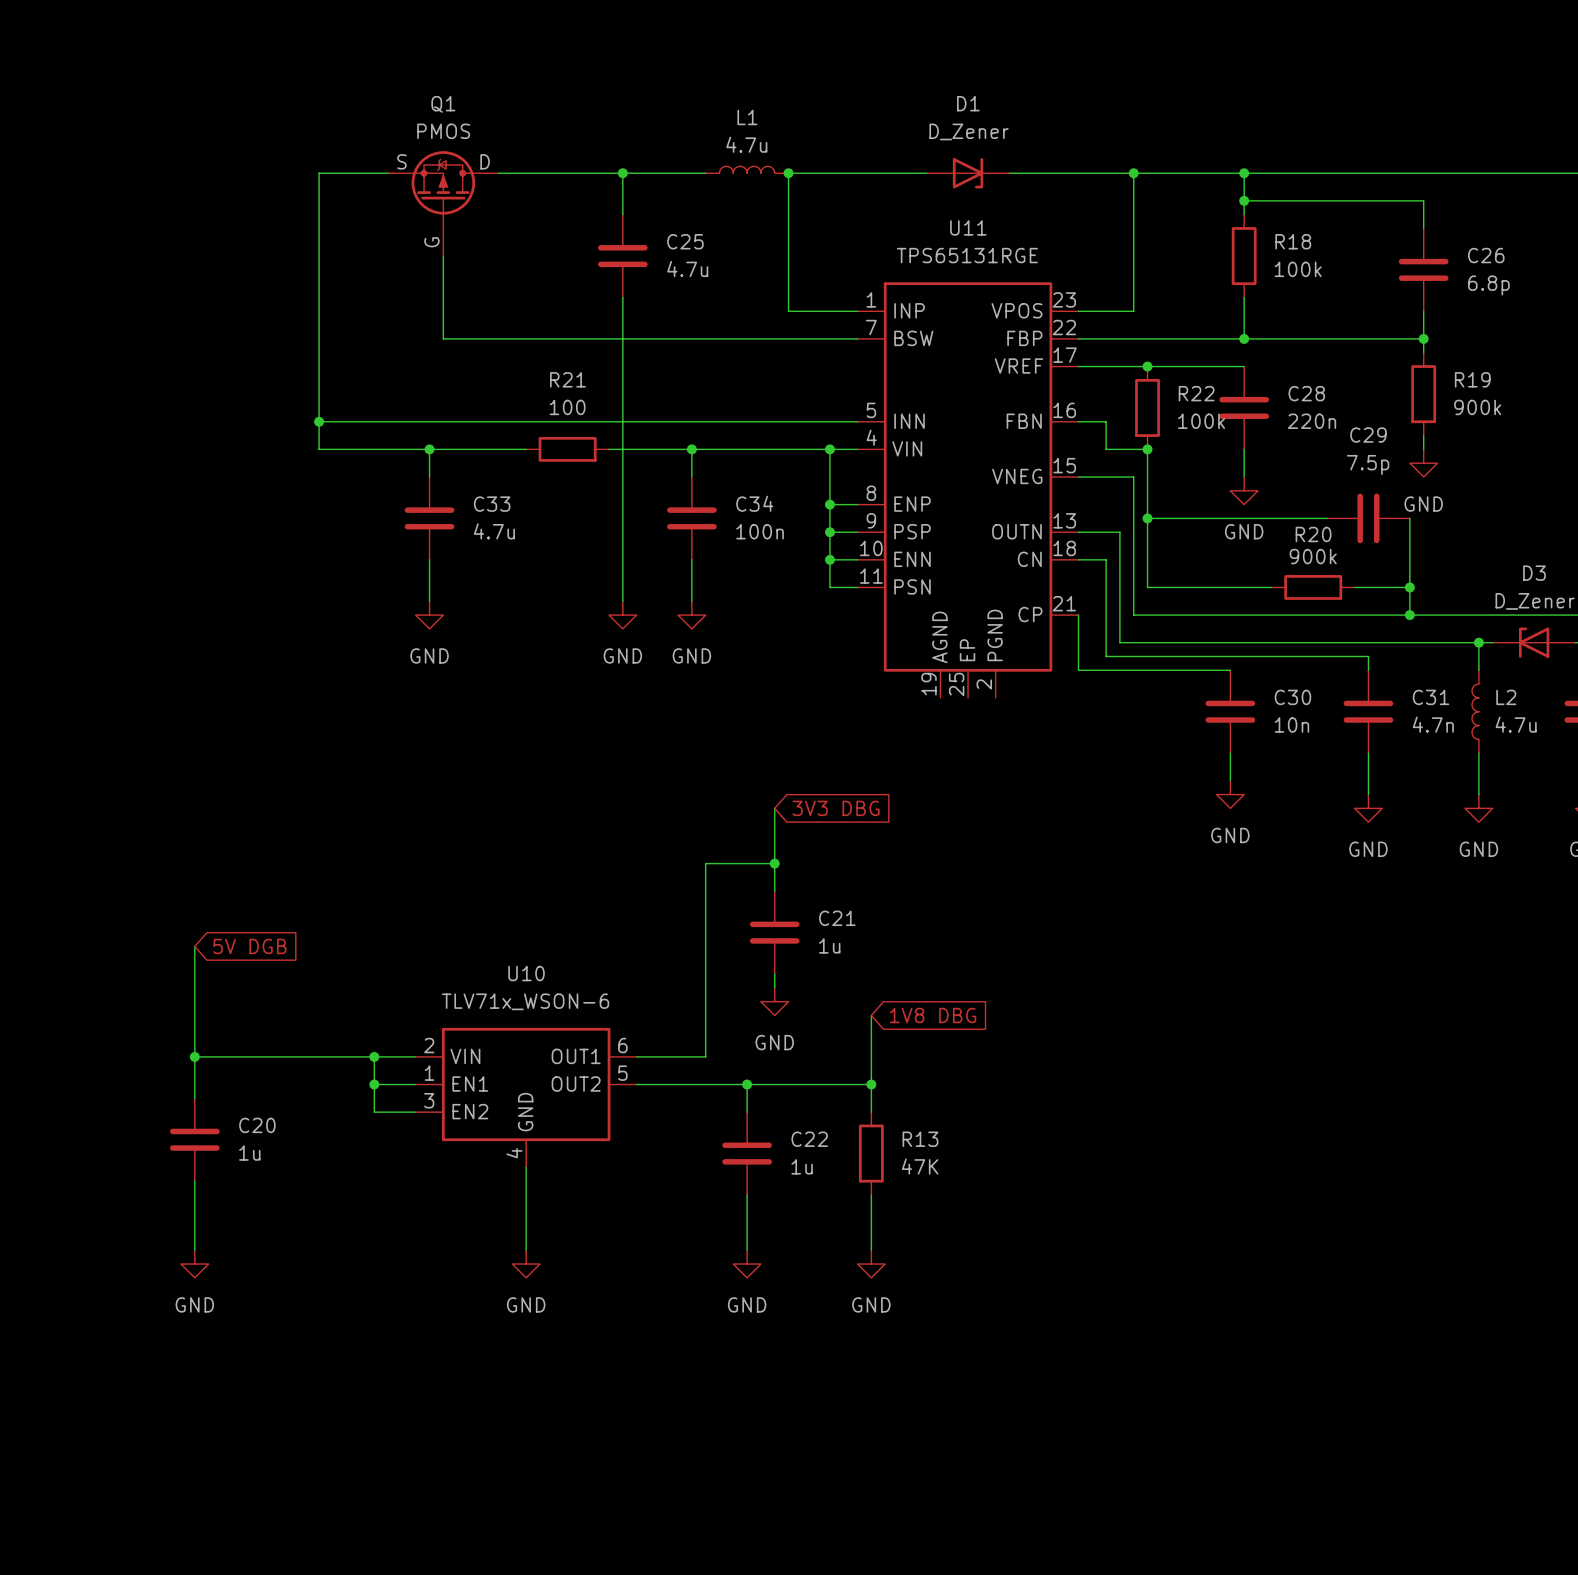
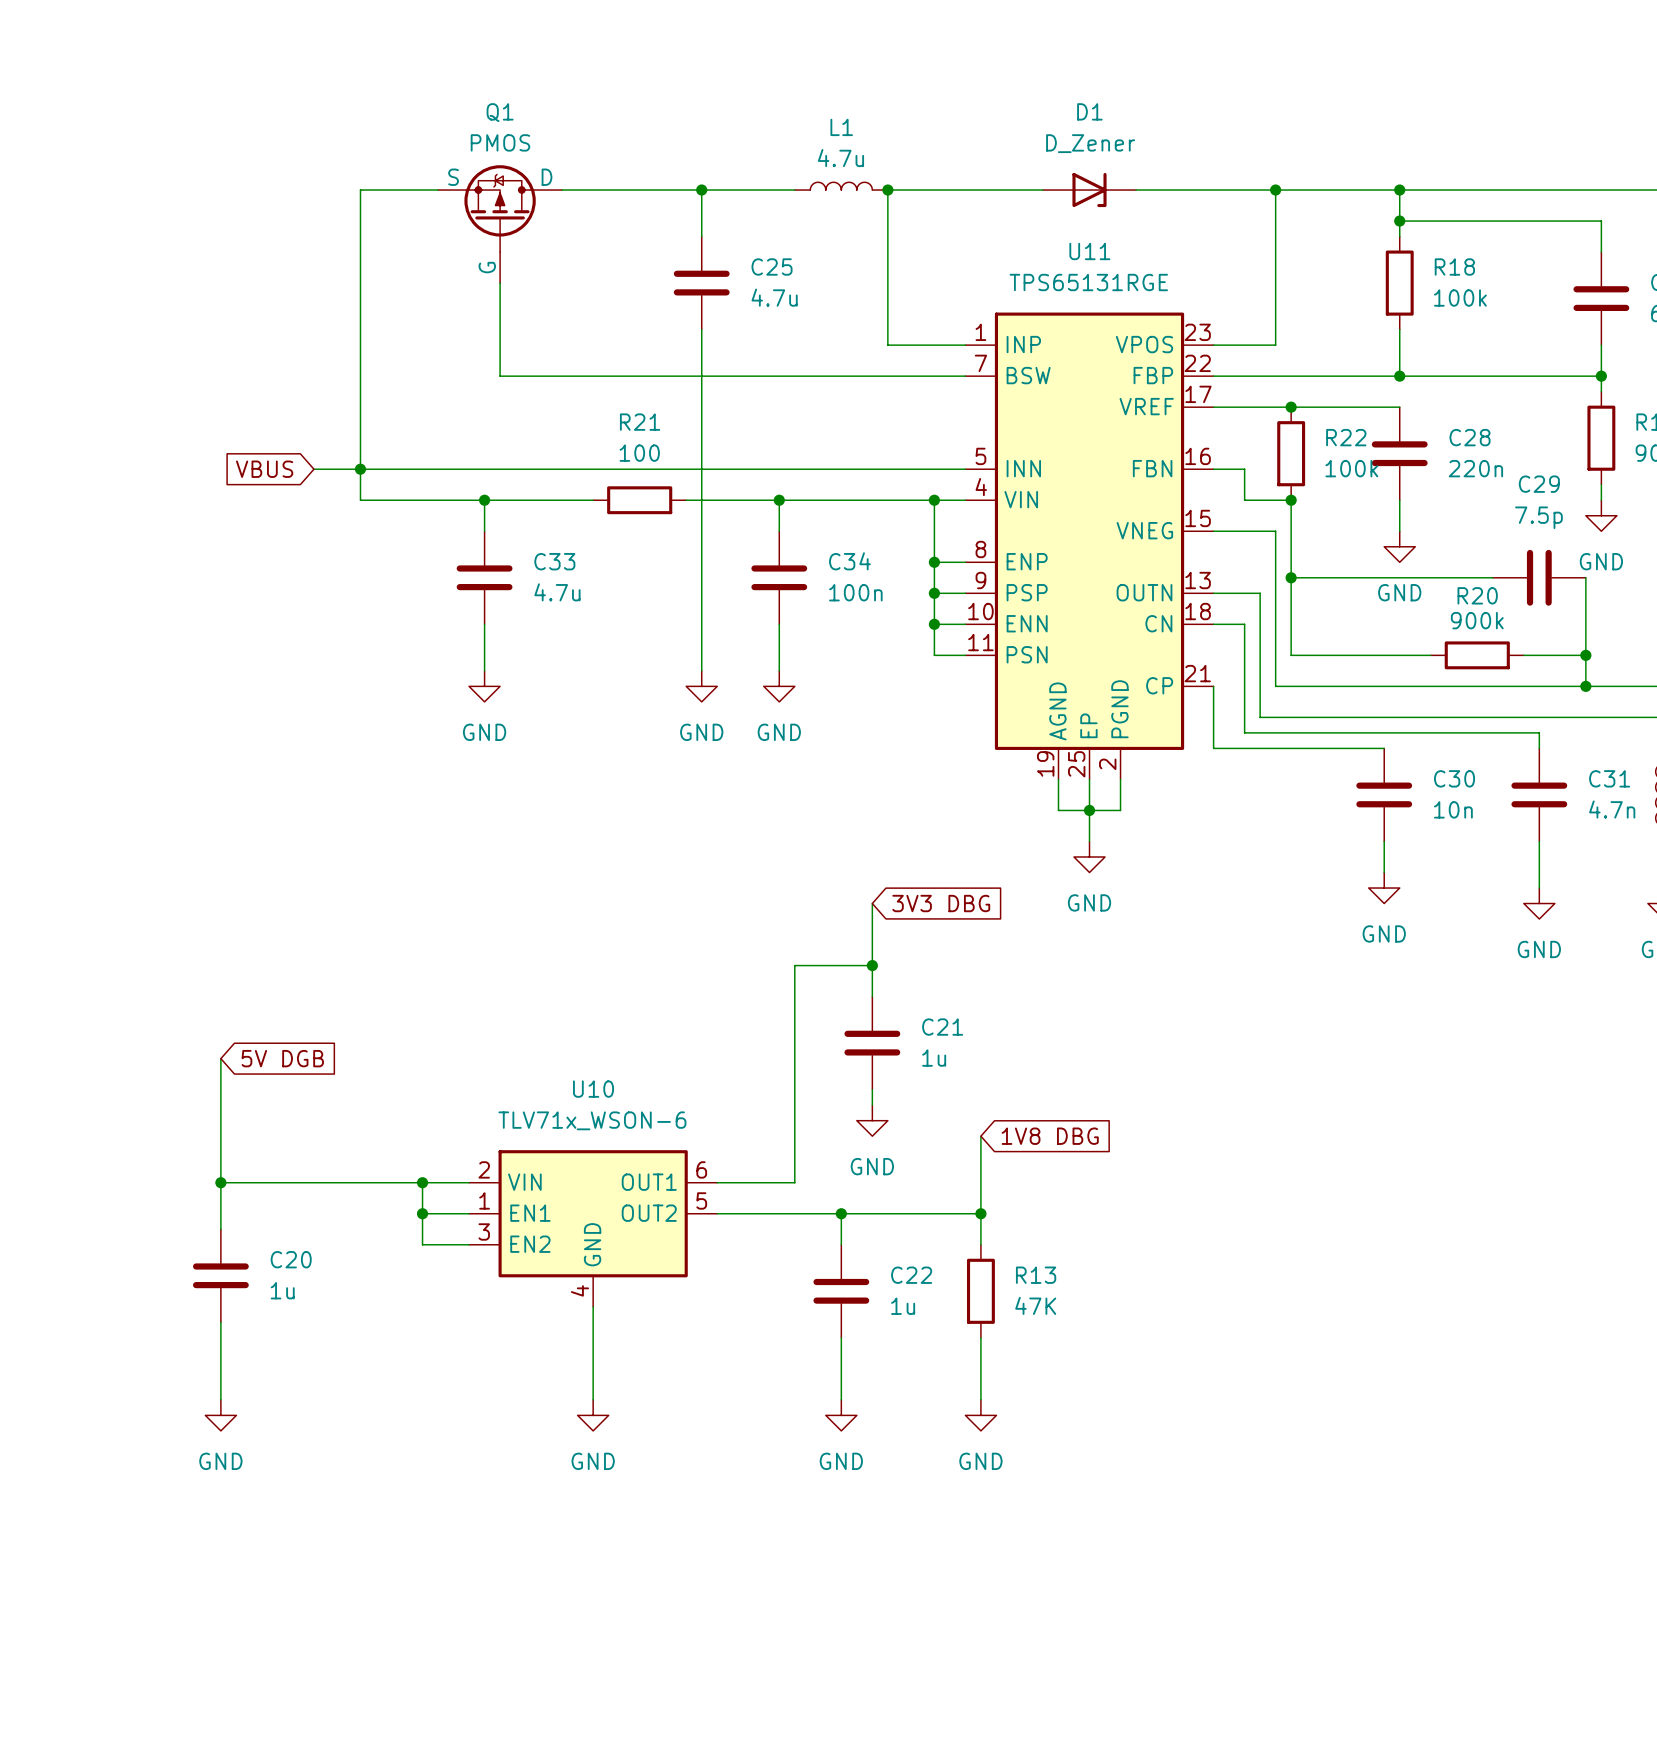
global label: none -> VBUS (264, 469)
wire: none -> (313, 469) (360, 469)
wire: none -> (1058, 779) (1058, 810) (1120, 810) (1120, 779)
wire: none -> (1089, 779) (1089, 841)
junction: none -> (1089, 810)
power symbol: none -> GND (1089, 856)

